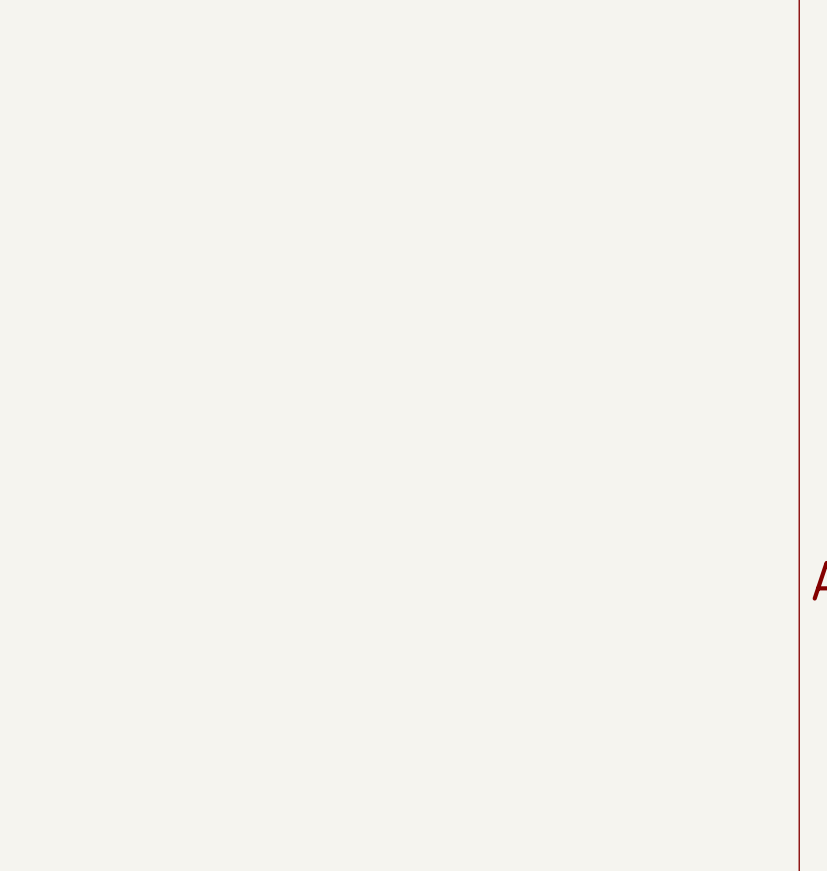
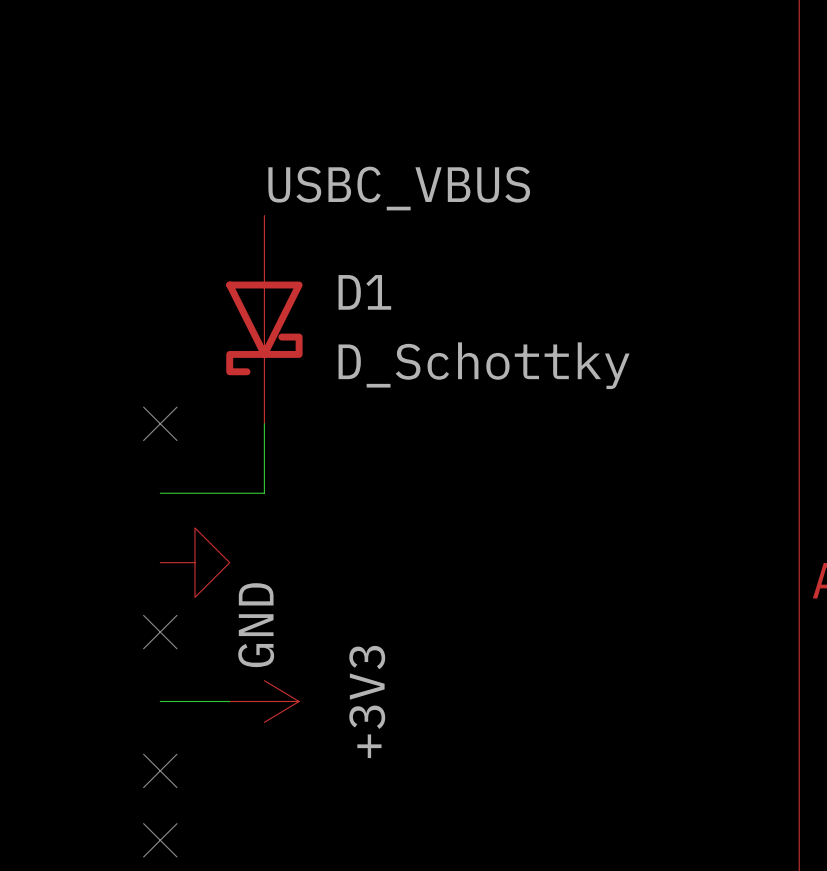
label: none -> USBC_VBUS (399, 188)
D1: none -> D_Schottky (264, 319)
no-connect mark: none -> (160, 423)
wire: none -> (264, 423) (264, 493) (160, 493)
power symbol: none -> GND (195, 562)
no-connect mark: none -> (160, 632)
wire: none -> (160, 701) (229, 701)
power symbol: none -> +3V3 (264, 701)
no-connect mark: none -> (160, 770)
no-connect mark: none -> (160, 840)

